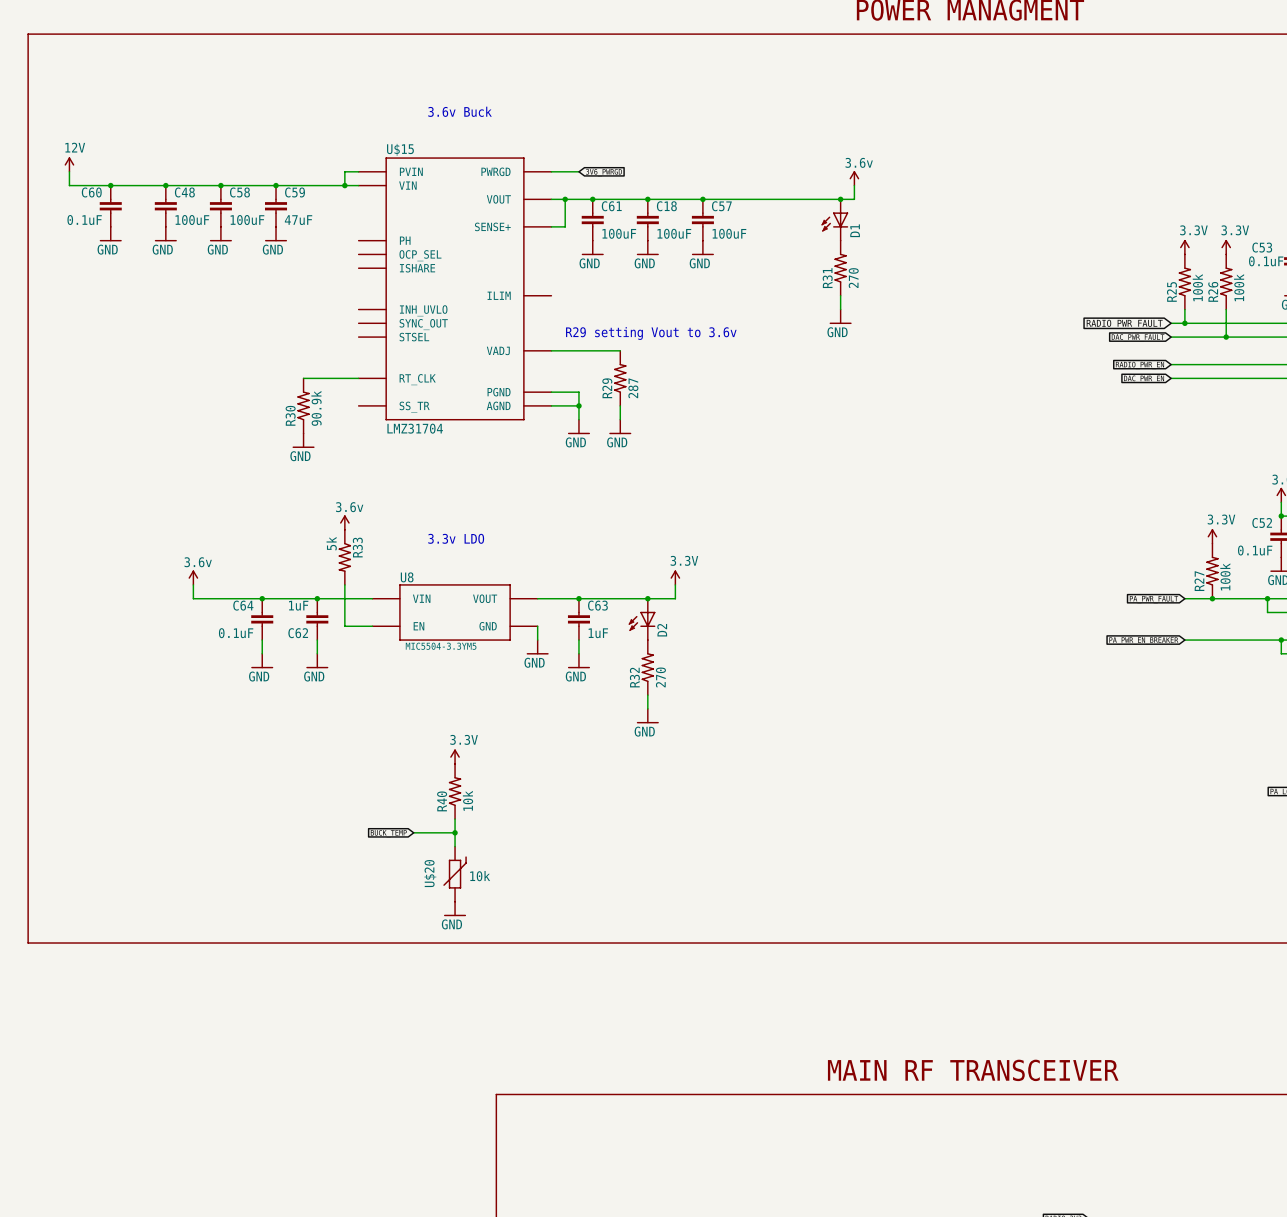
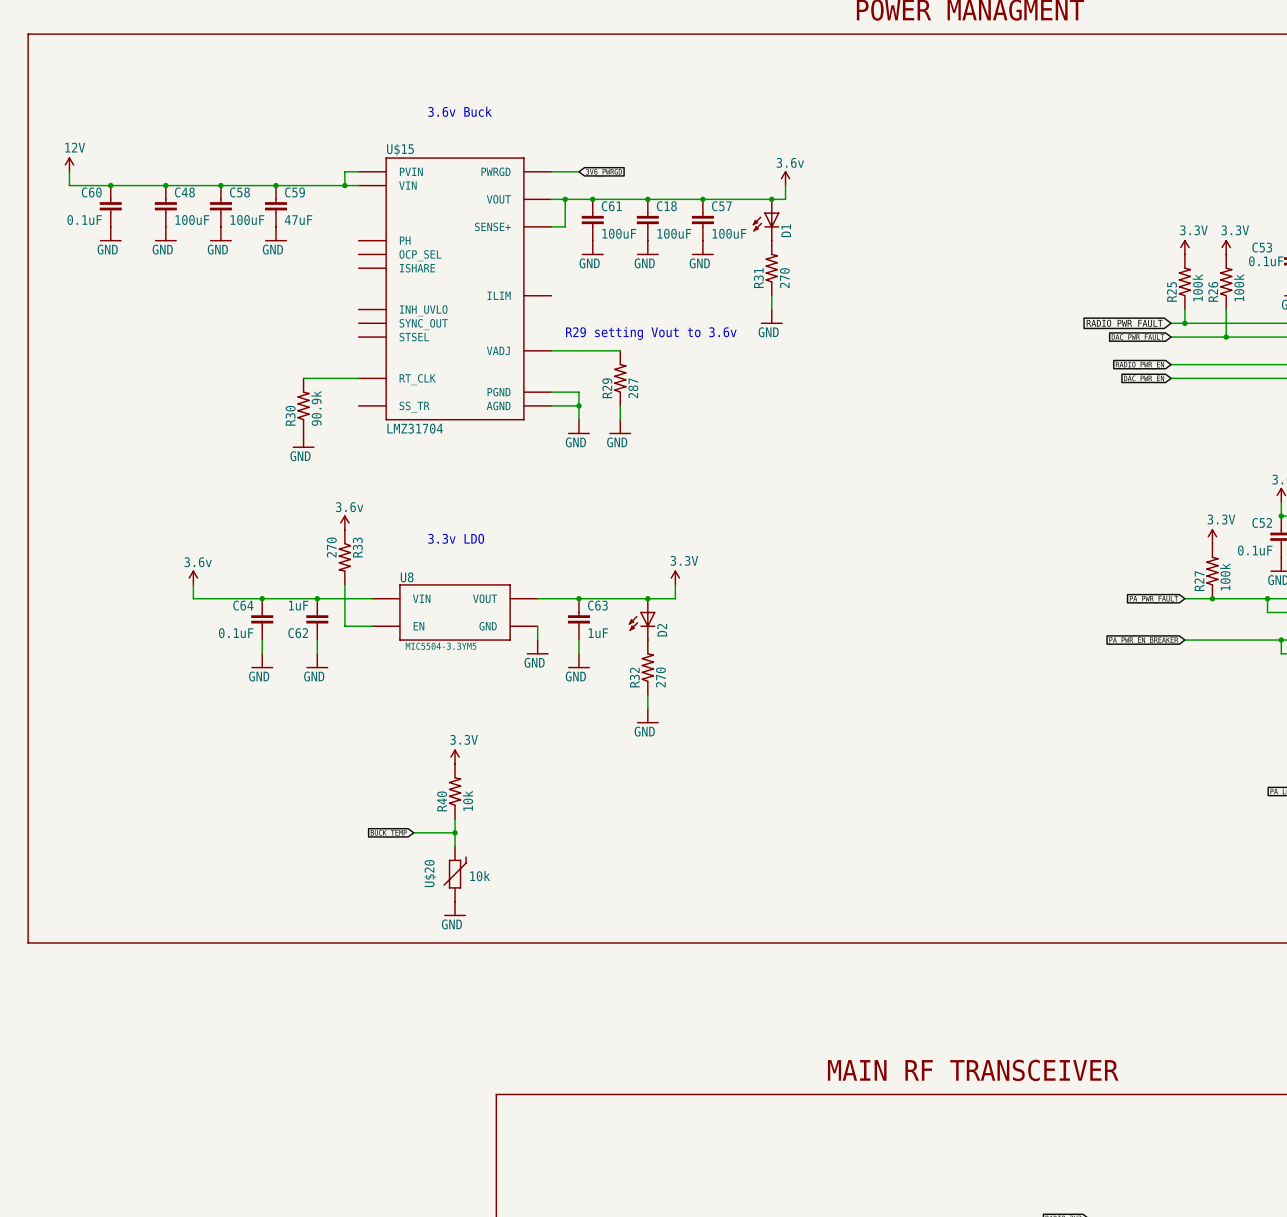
power symbol position: (854, 178) -> (785, 178)
wire: (854, 185) (854, 199) (785, 199) -> (785, 185) (785, 199)
junction: none -> (771, 199)
junction: (840, 199) -> none
D1 position: (834, 220) -> (766, 220)
R31 position: (840, 268) -> (771, 268)
wire: (840, 295) (840, 309) -> (771, 295) (771, 309)
power symbol position: GND (840, 316) -> GND (771, 316)
R33 value: 5k (331, 543) -> 270 (331, 547)

